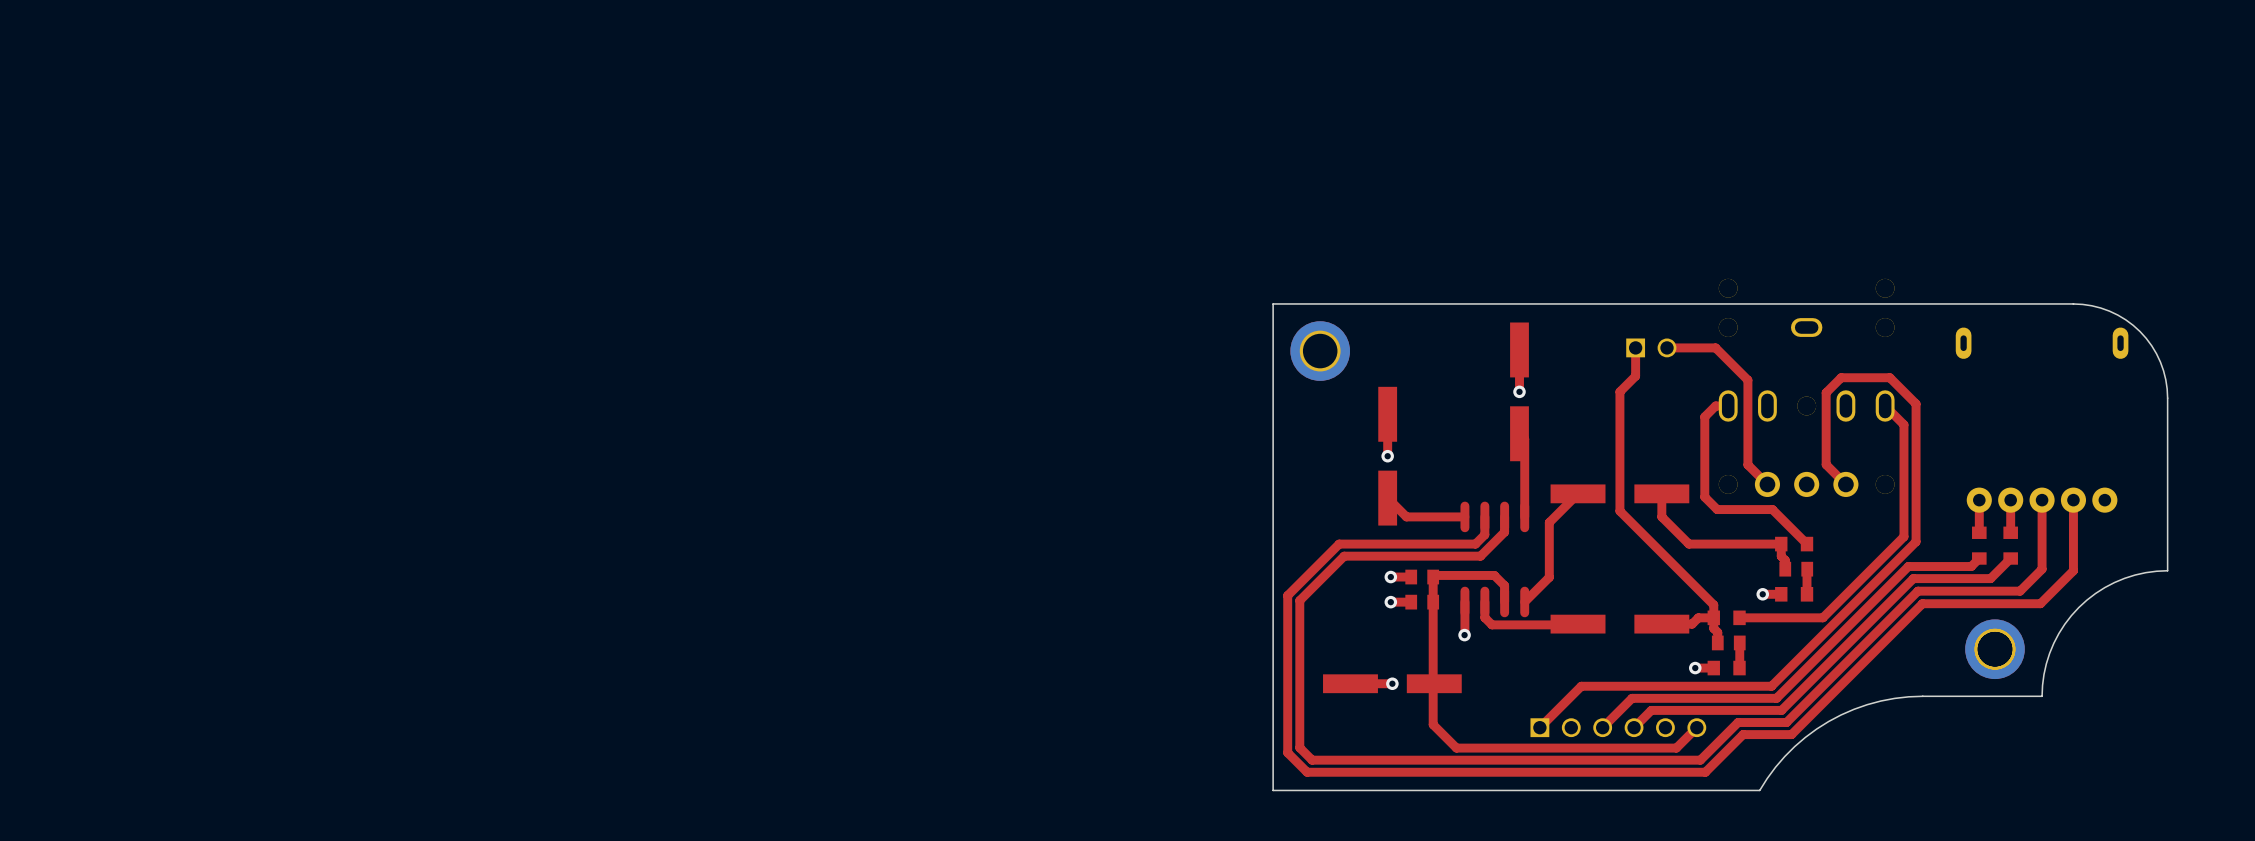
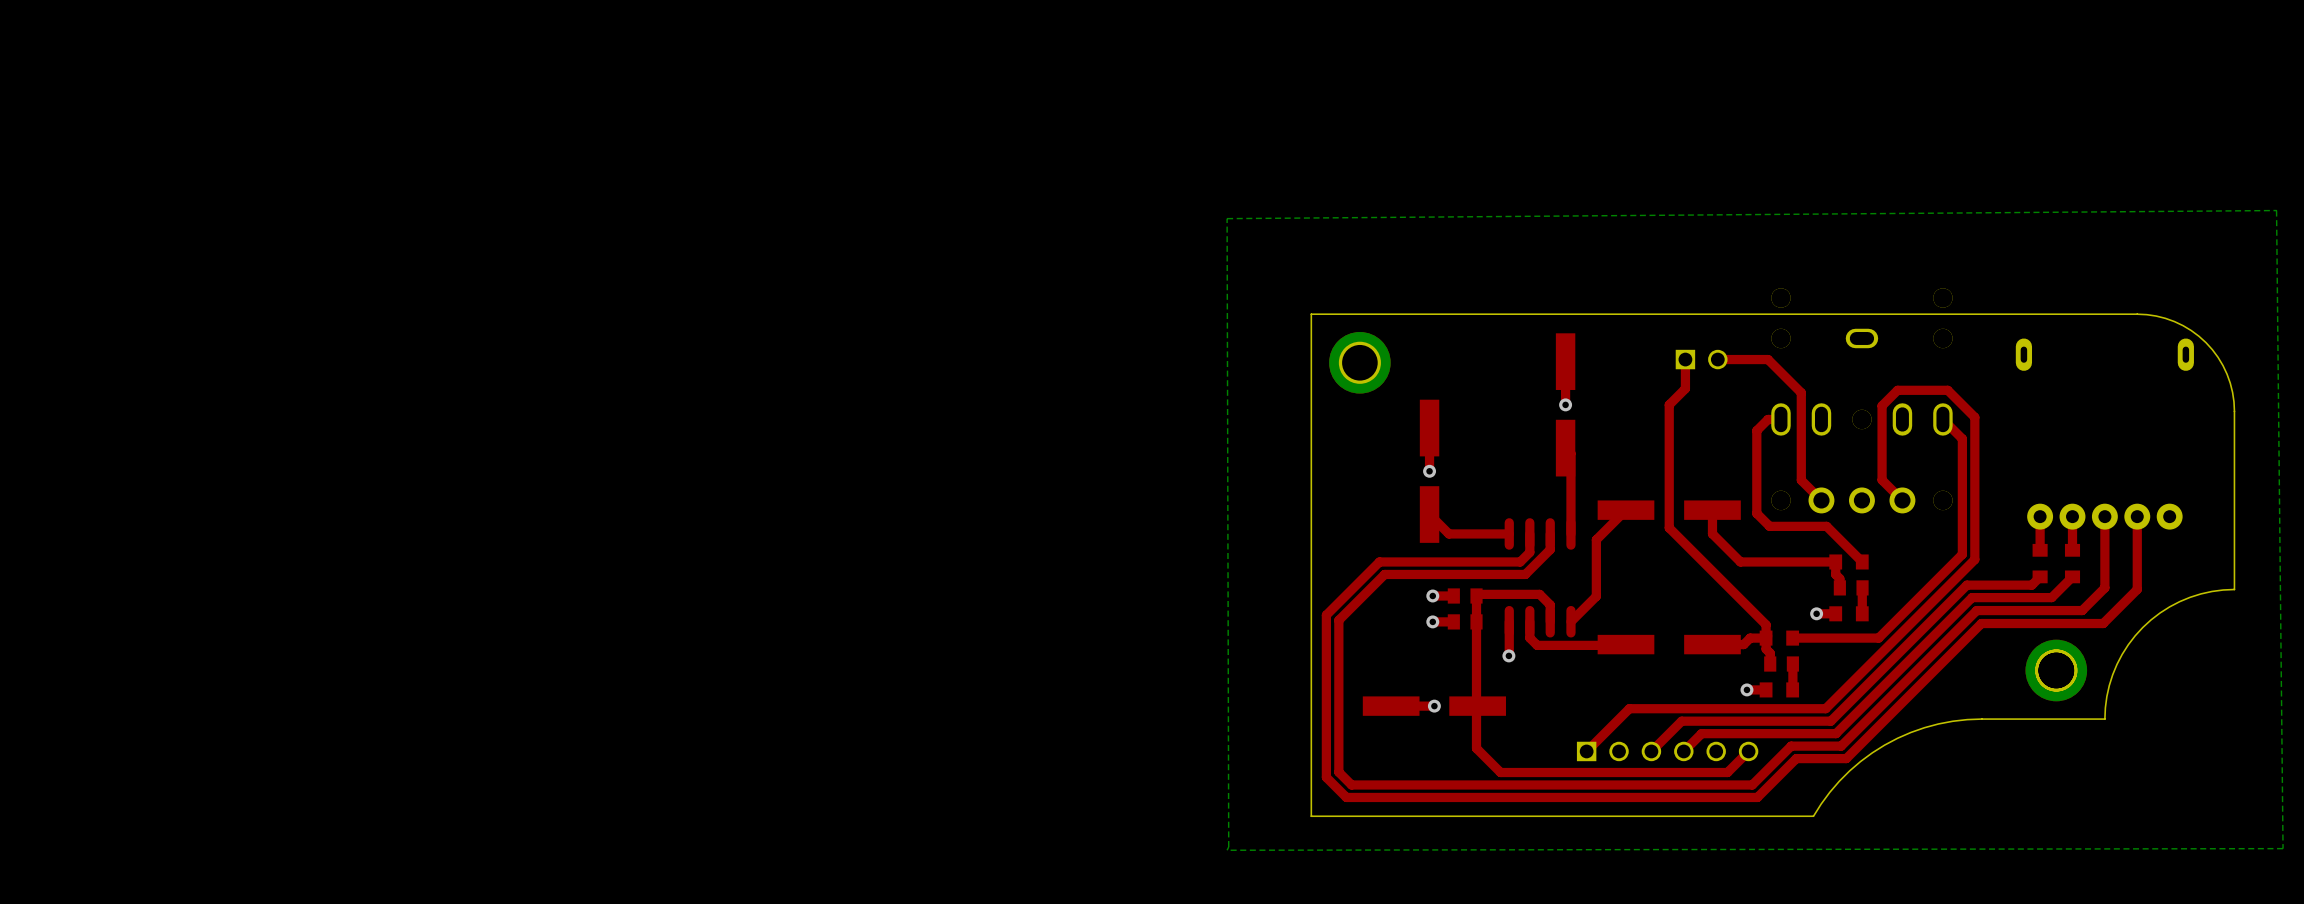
bottom zone outline: none -> (2276, 210) (1227, 218) (1228, 847) (1227, 850) (2283, 848) (2276, 210)

